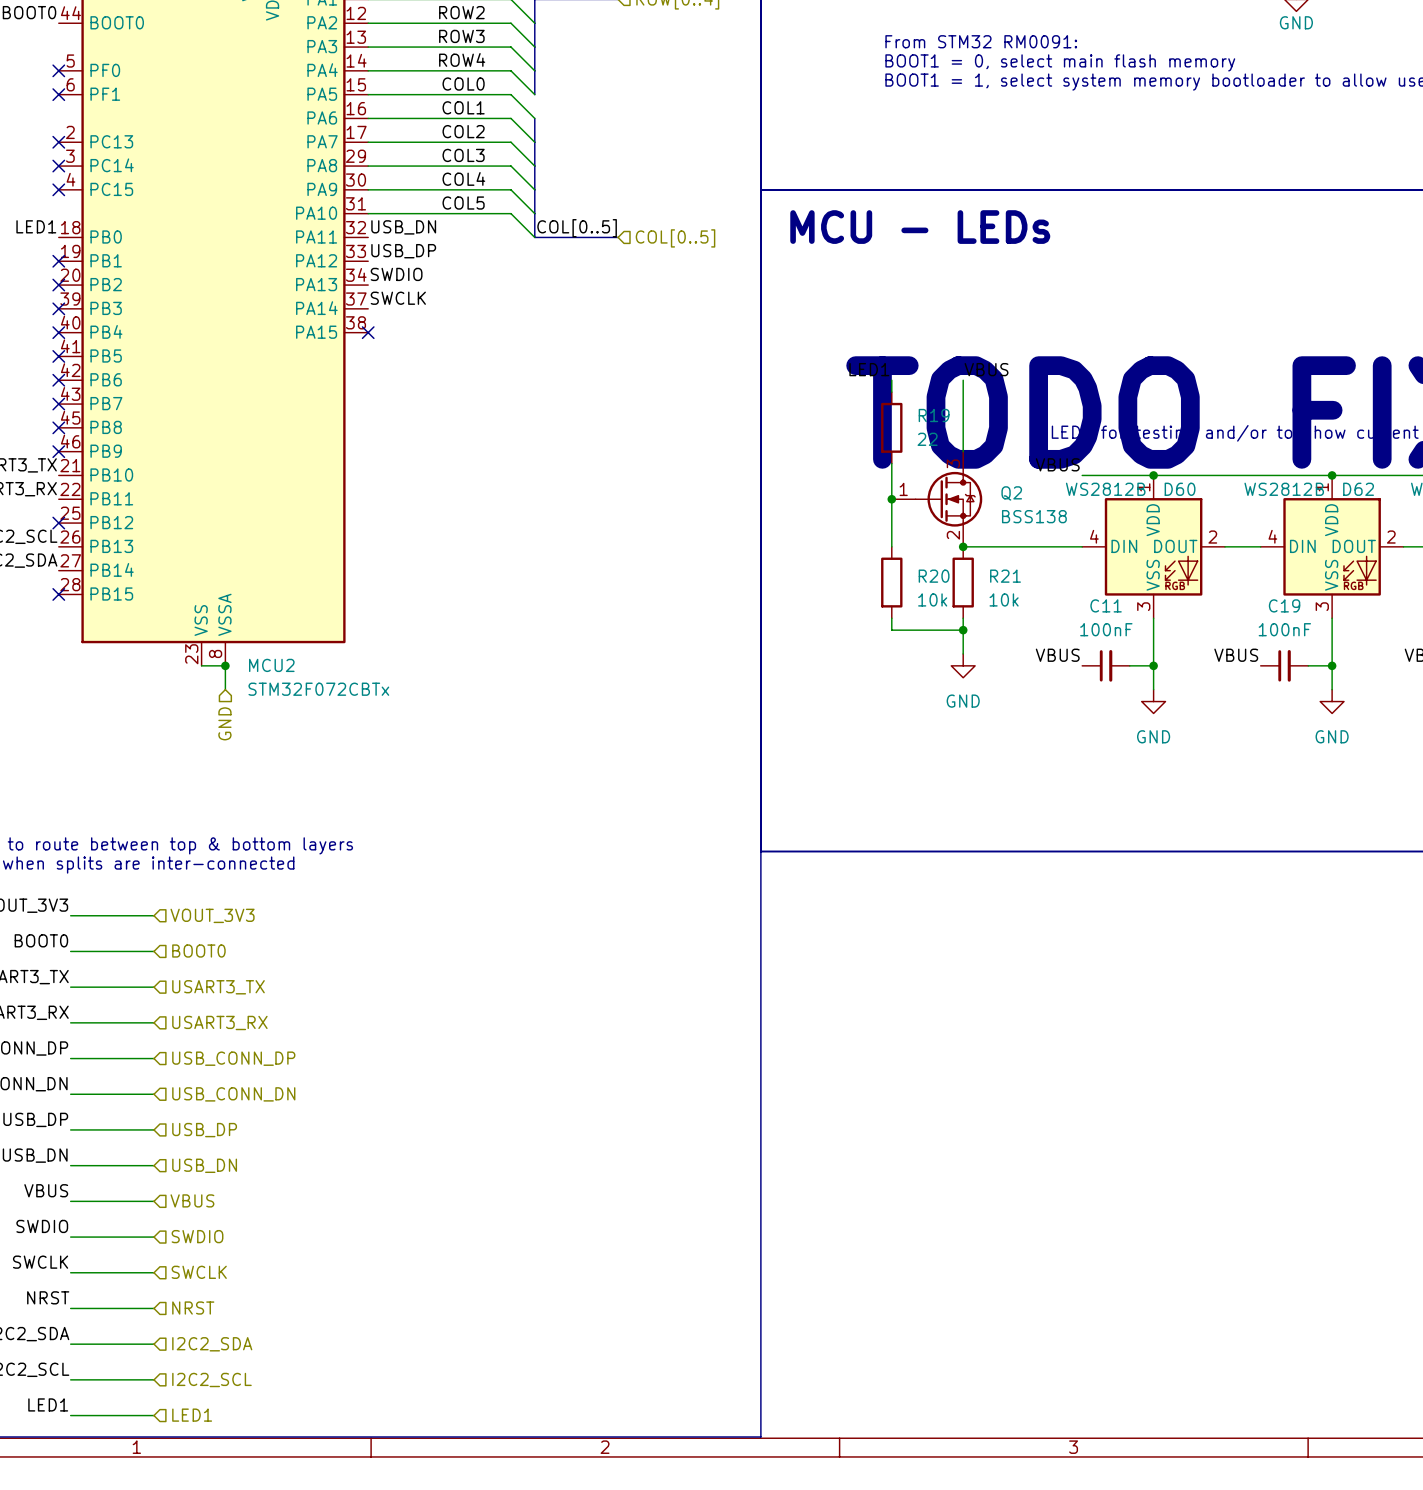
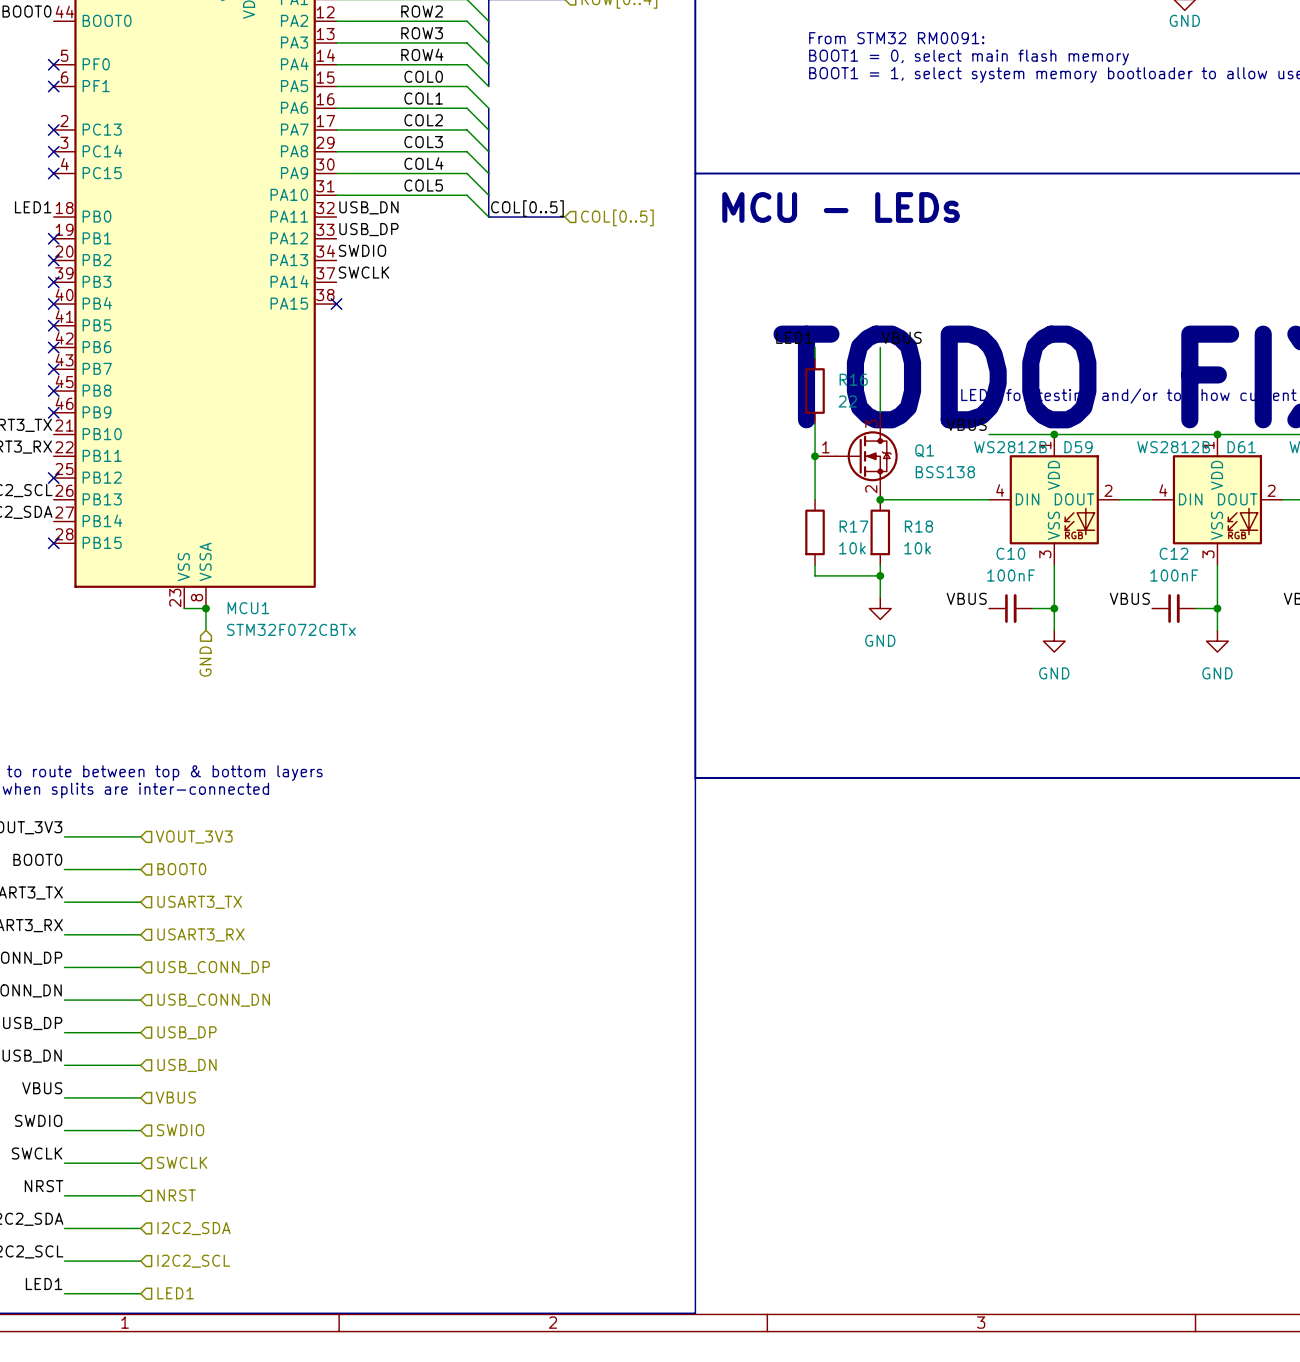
R19 name: R19 (934, 415) -> R16 (853, 379)
D60 name: D60 (1180, 489) -> D59 (1078, 447)
D62 name: D62 (1358, 489) -> D61 (1241, 447)
Q2 name: Q2 (1011, 493) -> Q1 (924, 450)
R20 name: R20 (934, 576) -> R17 (853, 526)
R21 name: R21 (1005, 576) -> R18 (918, 526)
C11 name: C11 (1106, 605) -> C10 (1010, 553)
C19 name: C19 (1284, 605) -> C12 (1173, 553)
MCU2 name: MCU2 (271, 665) -> MCU1 (248, 608)

